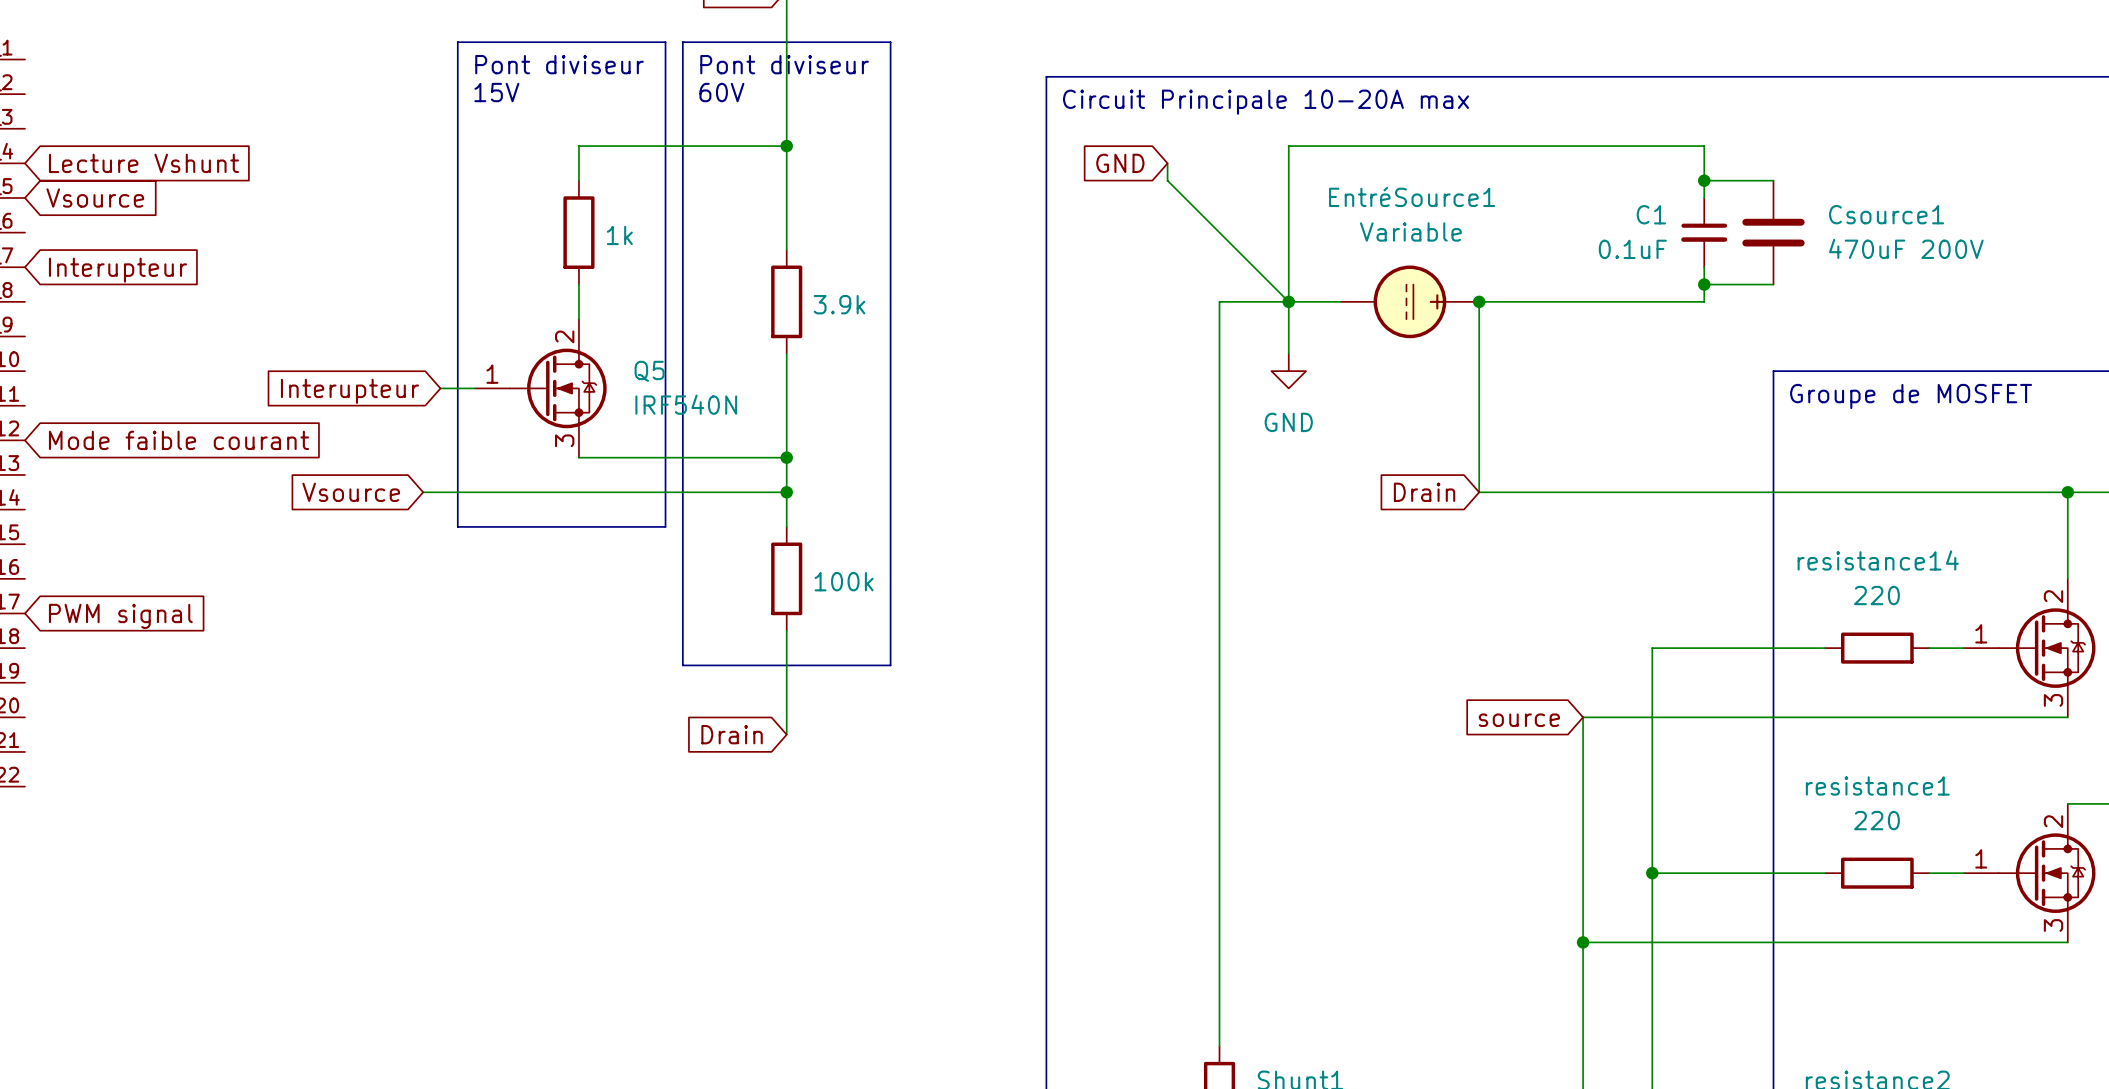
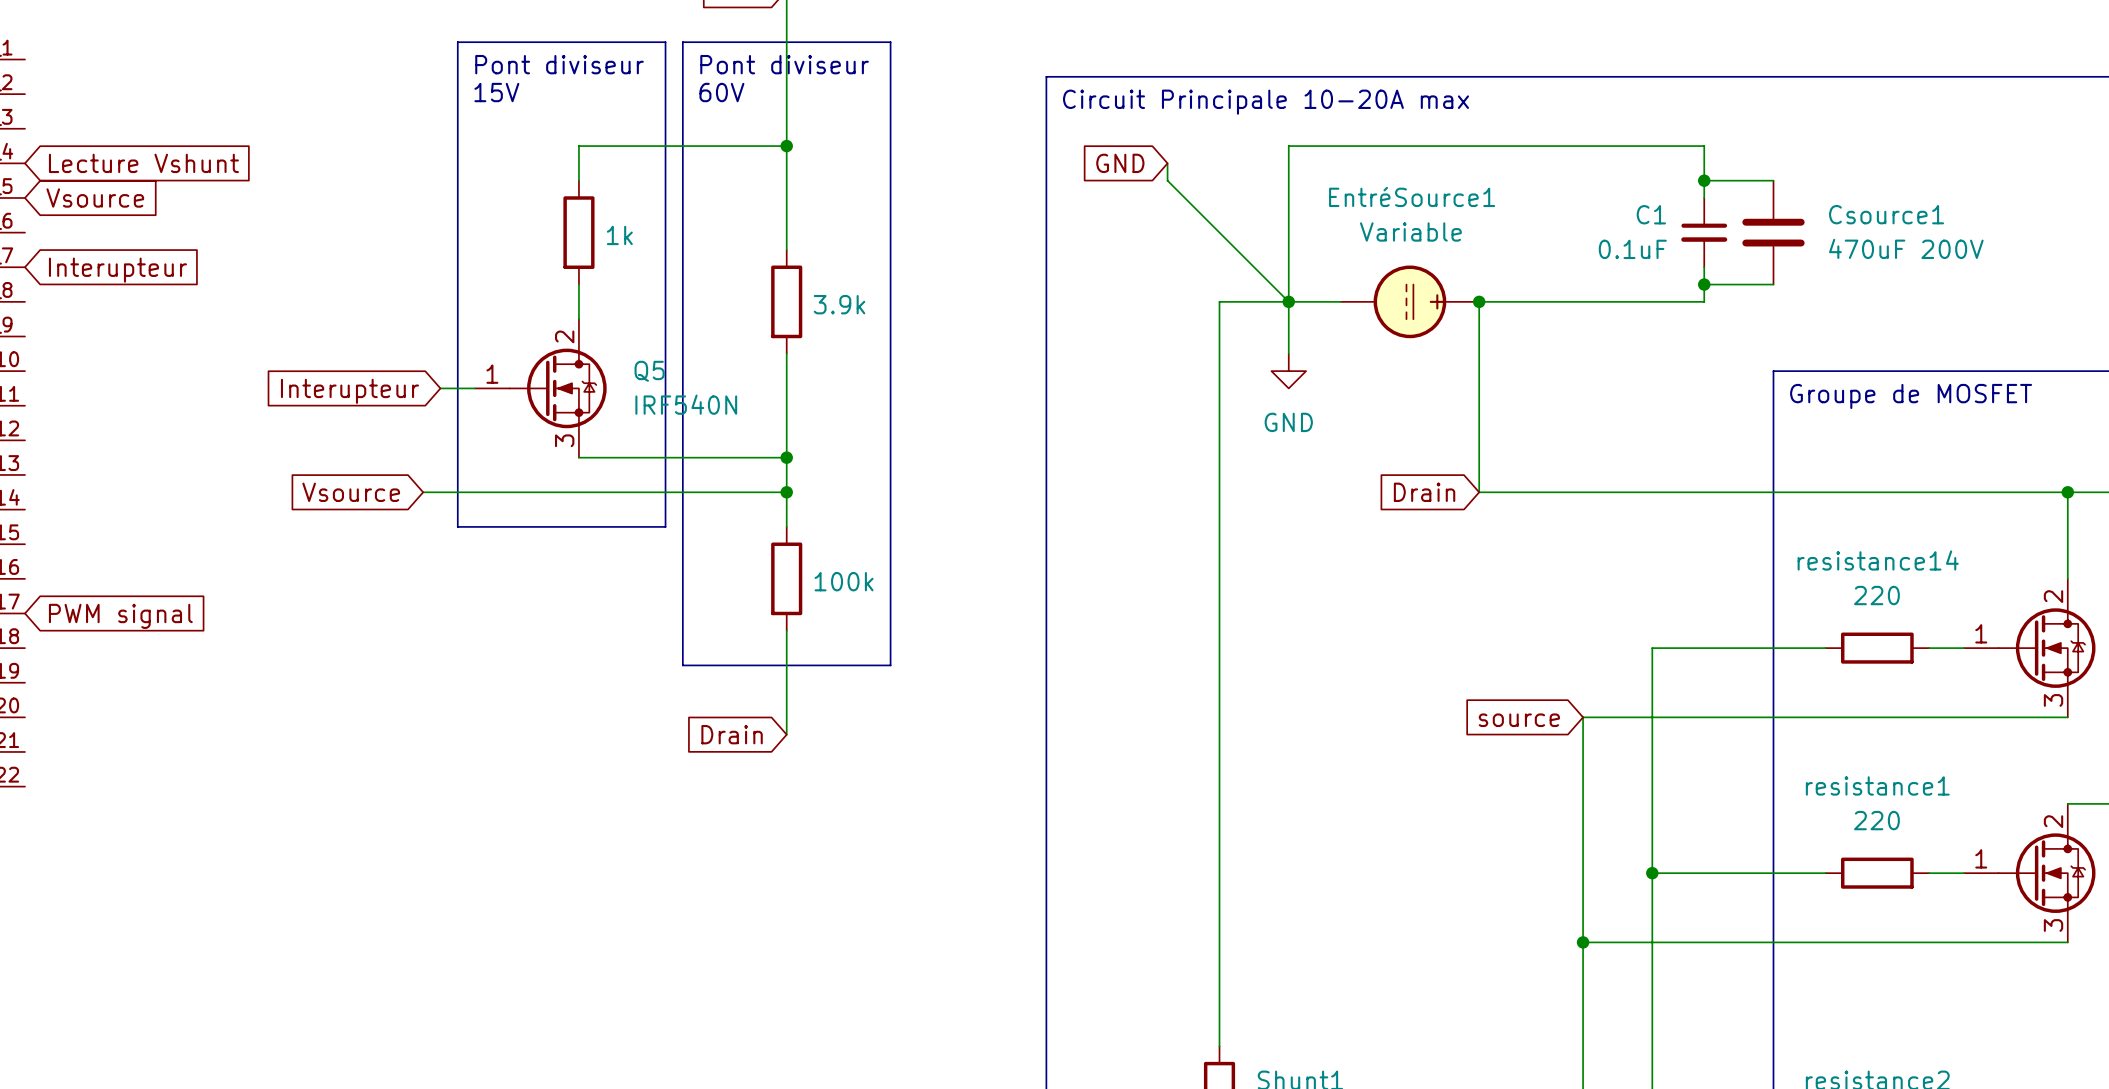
global label: Mode faible courant (178, 440) -> none

